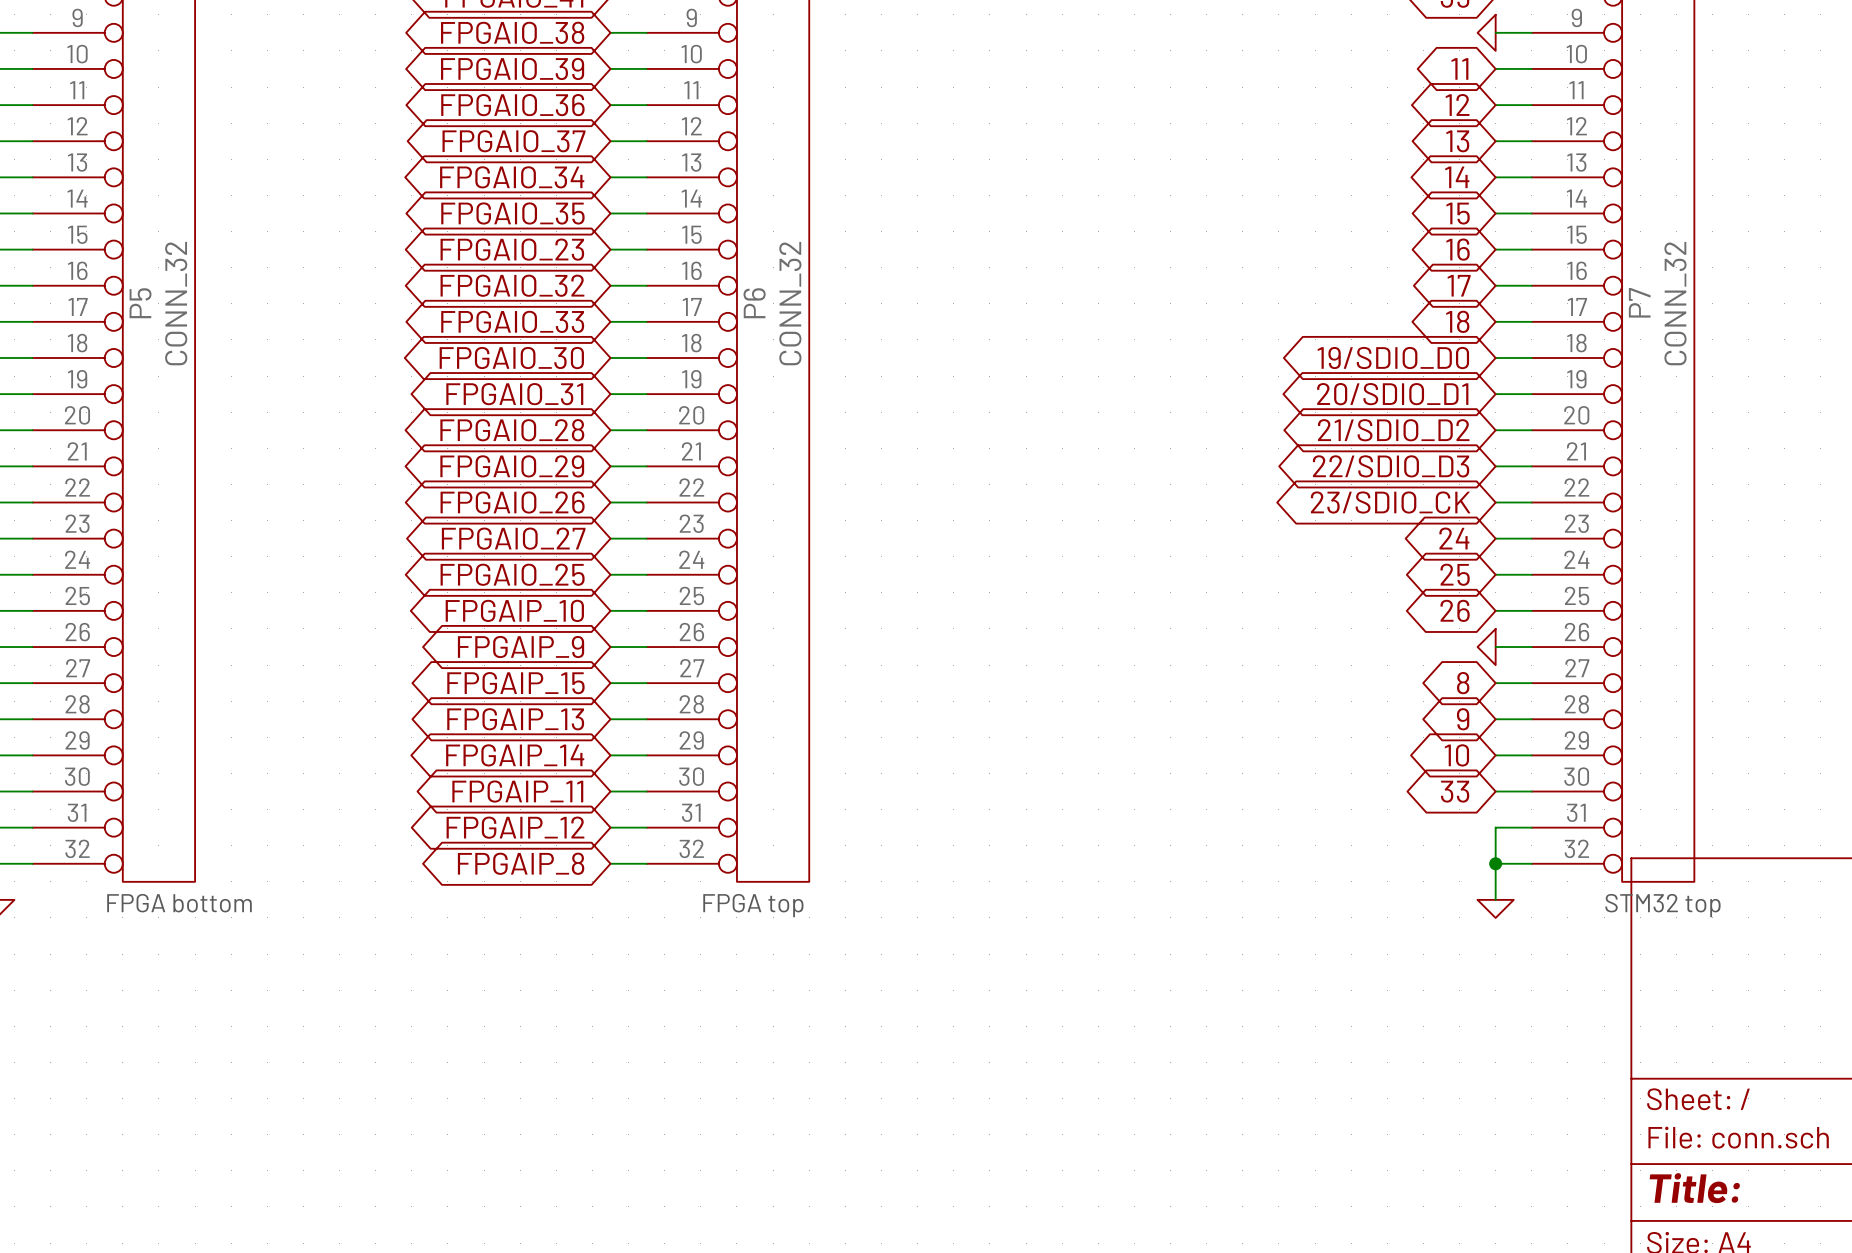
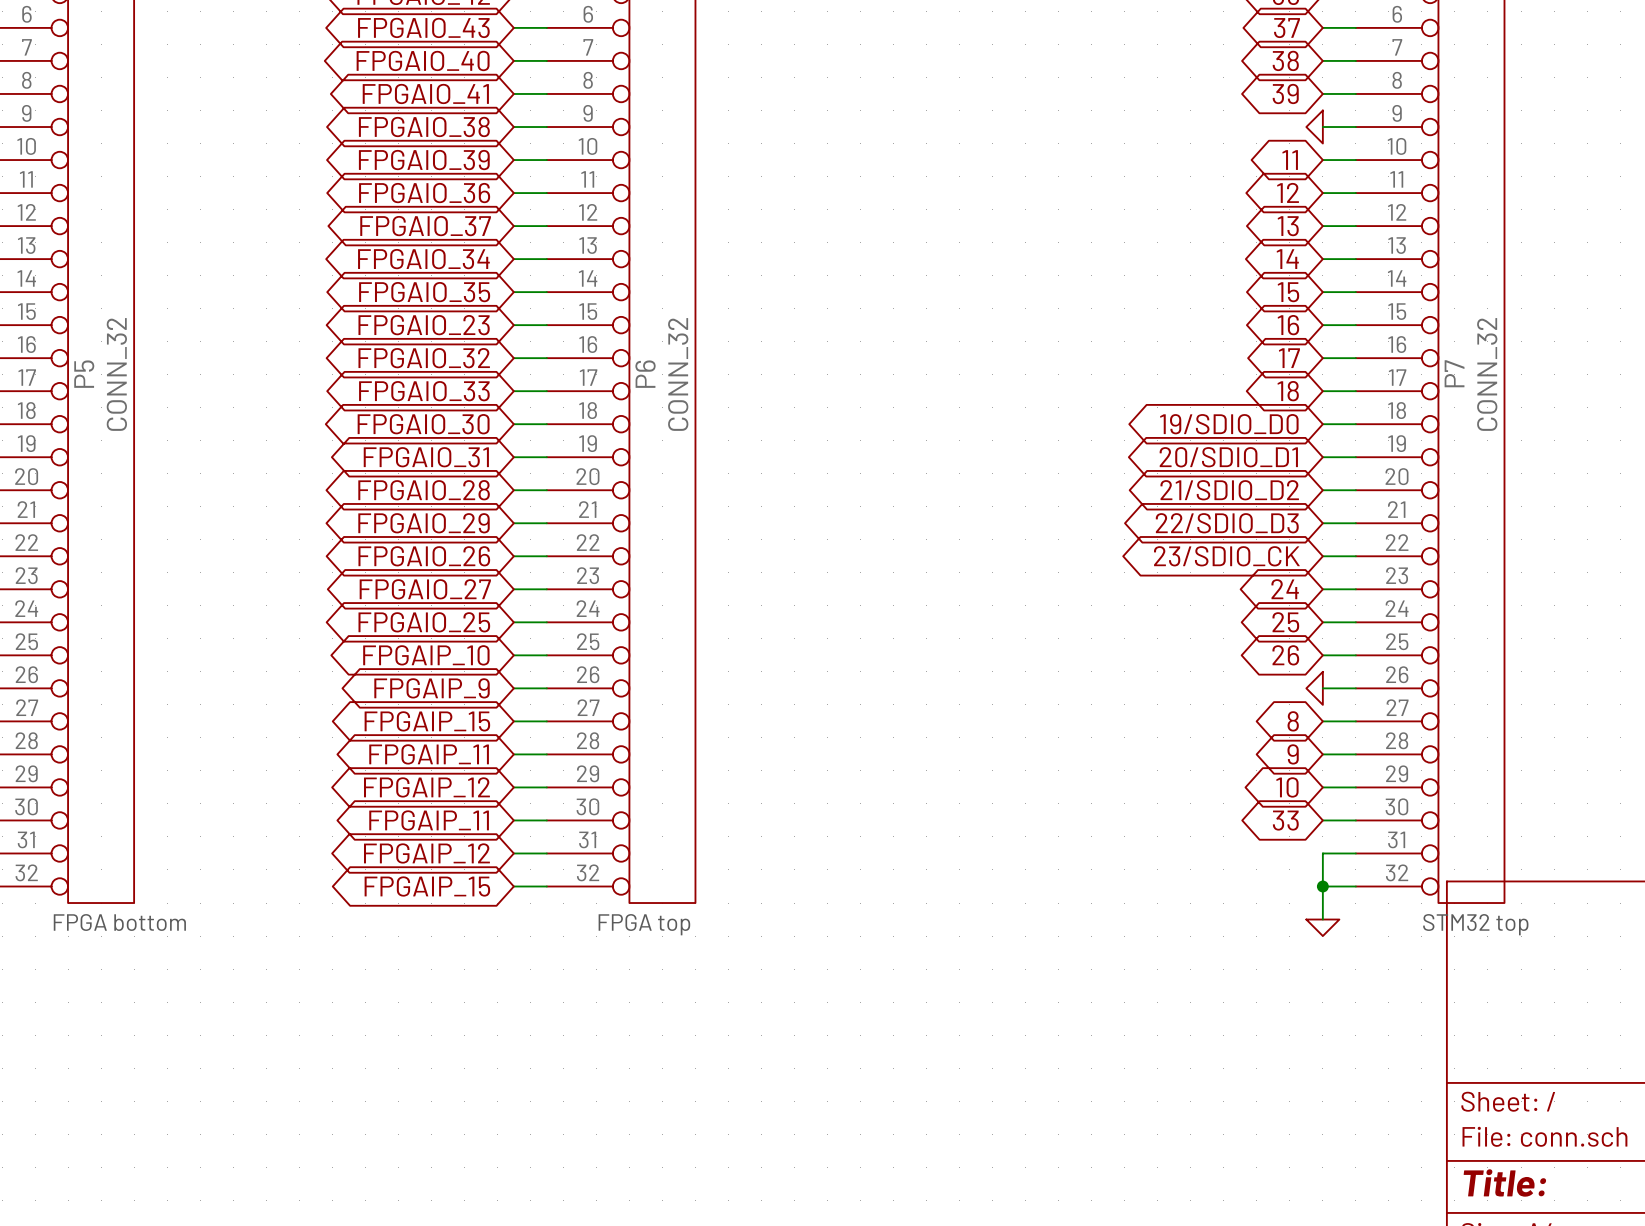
global label: FPGAIP_13 (515, 719) -> FPGAIP_11 (429, 754)
global label: FPGAIP_14 (515, 755) -> FPGAIP_12 (426, 787)
global label: FPGAIP_8 (521, 863) -> FPGAIP_15 (427, 886)

